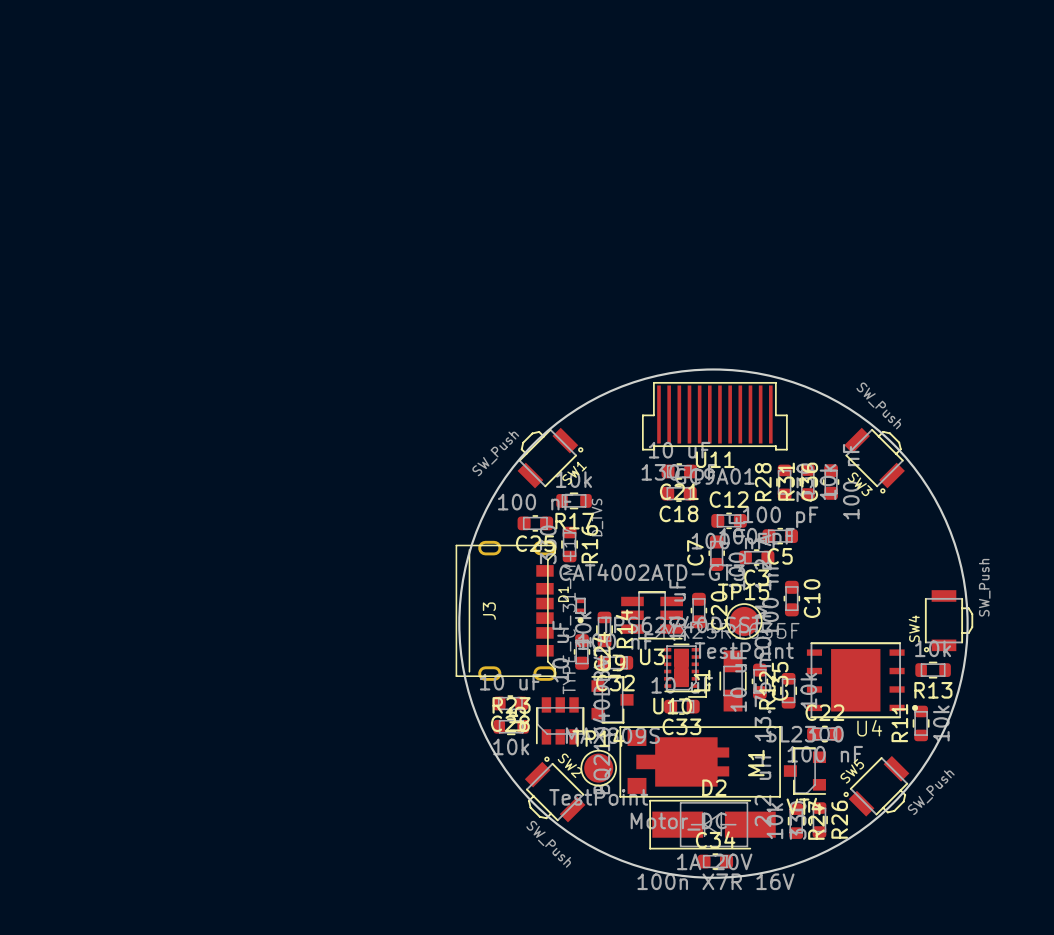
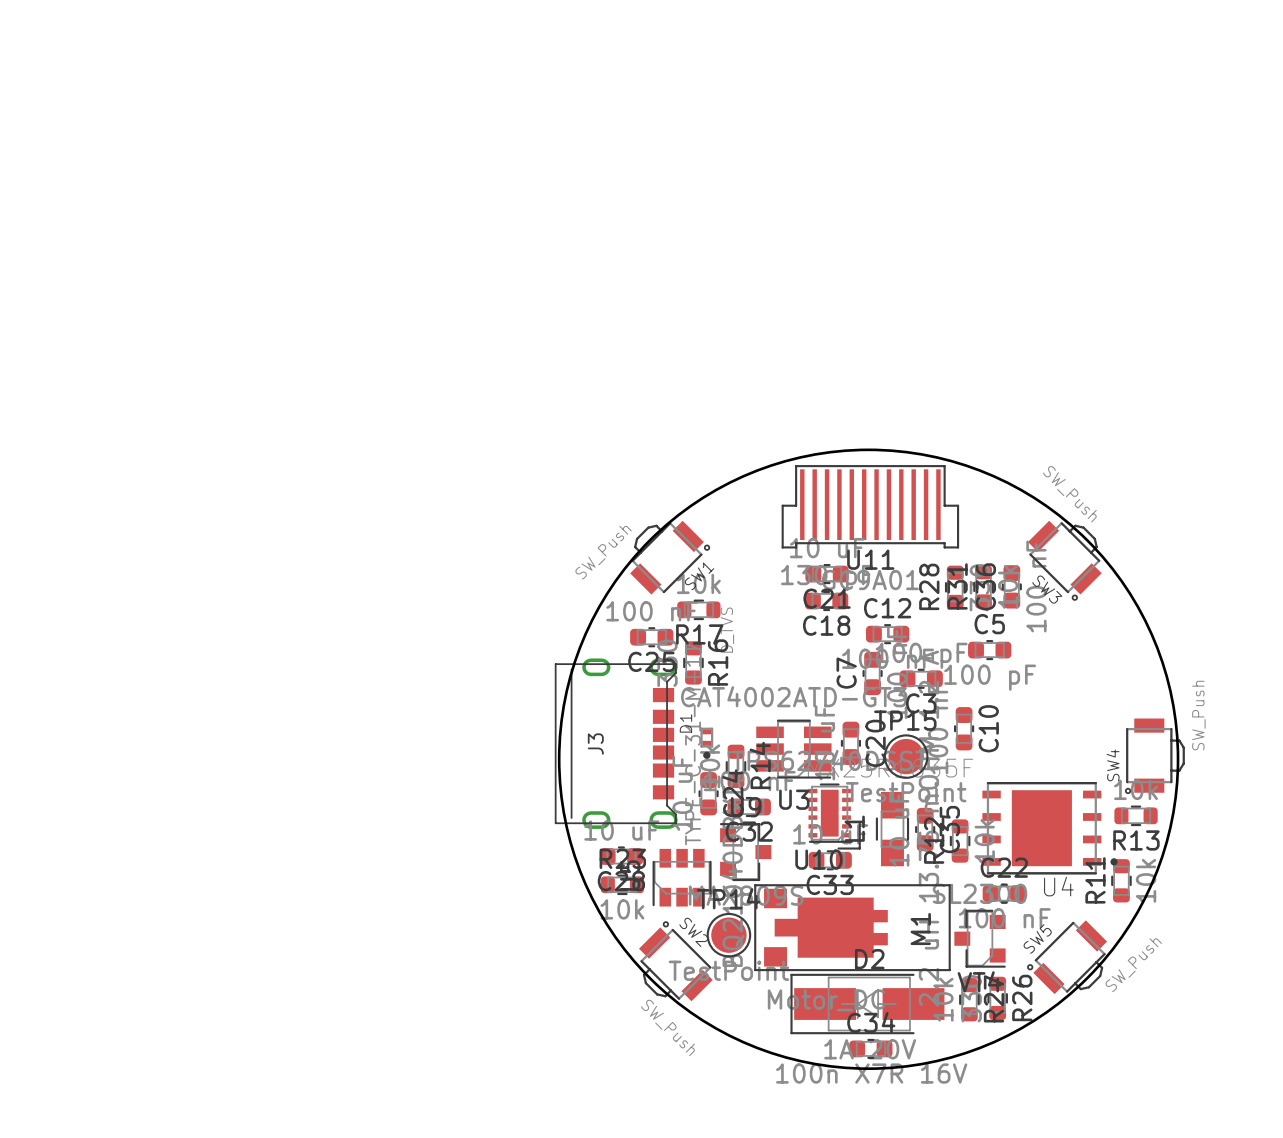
C5 value position: 100 pF (780, 517) -> 100 pF (990, 677)
C5 position: (780, 536) -> (989, 650)
C5 name position: C5 (780, 556) -> C5 (989, 624)

